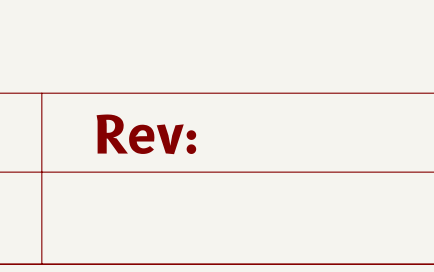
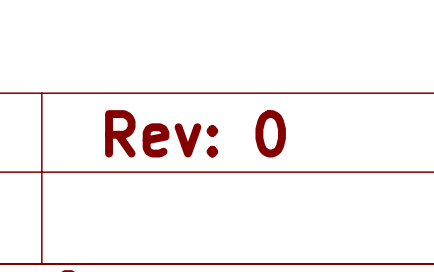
title block: Rev: (146, 134) -> Rev: 0 (195, 133)

